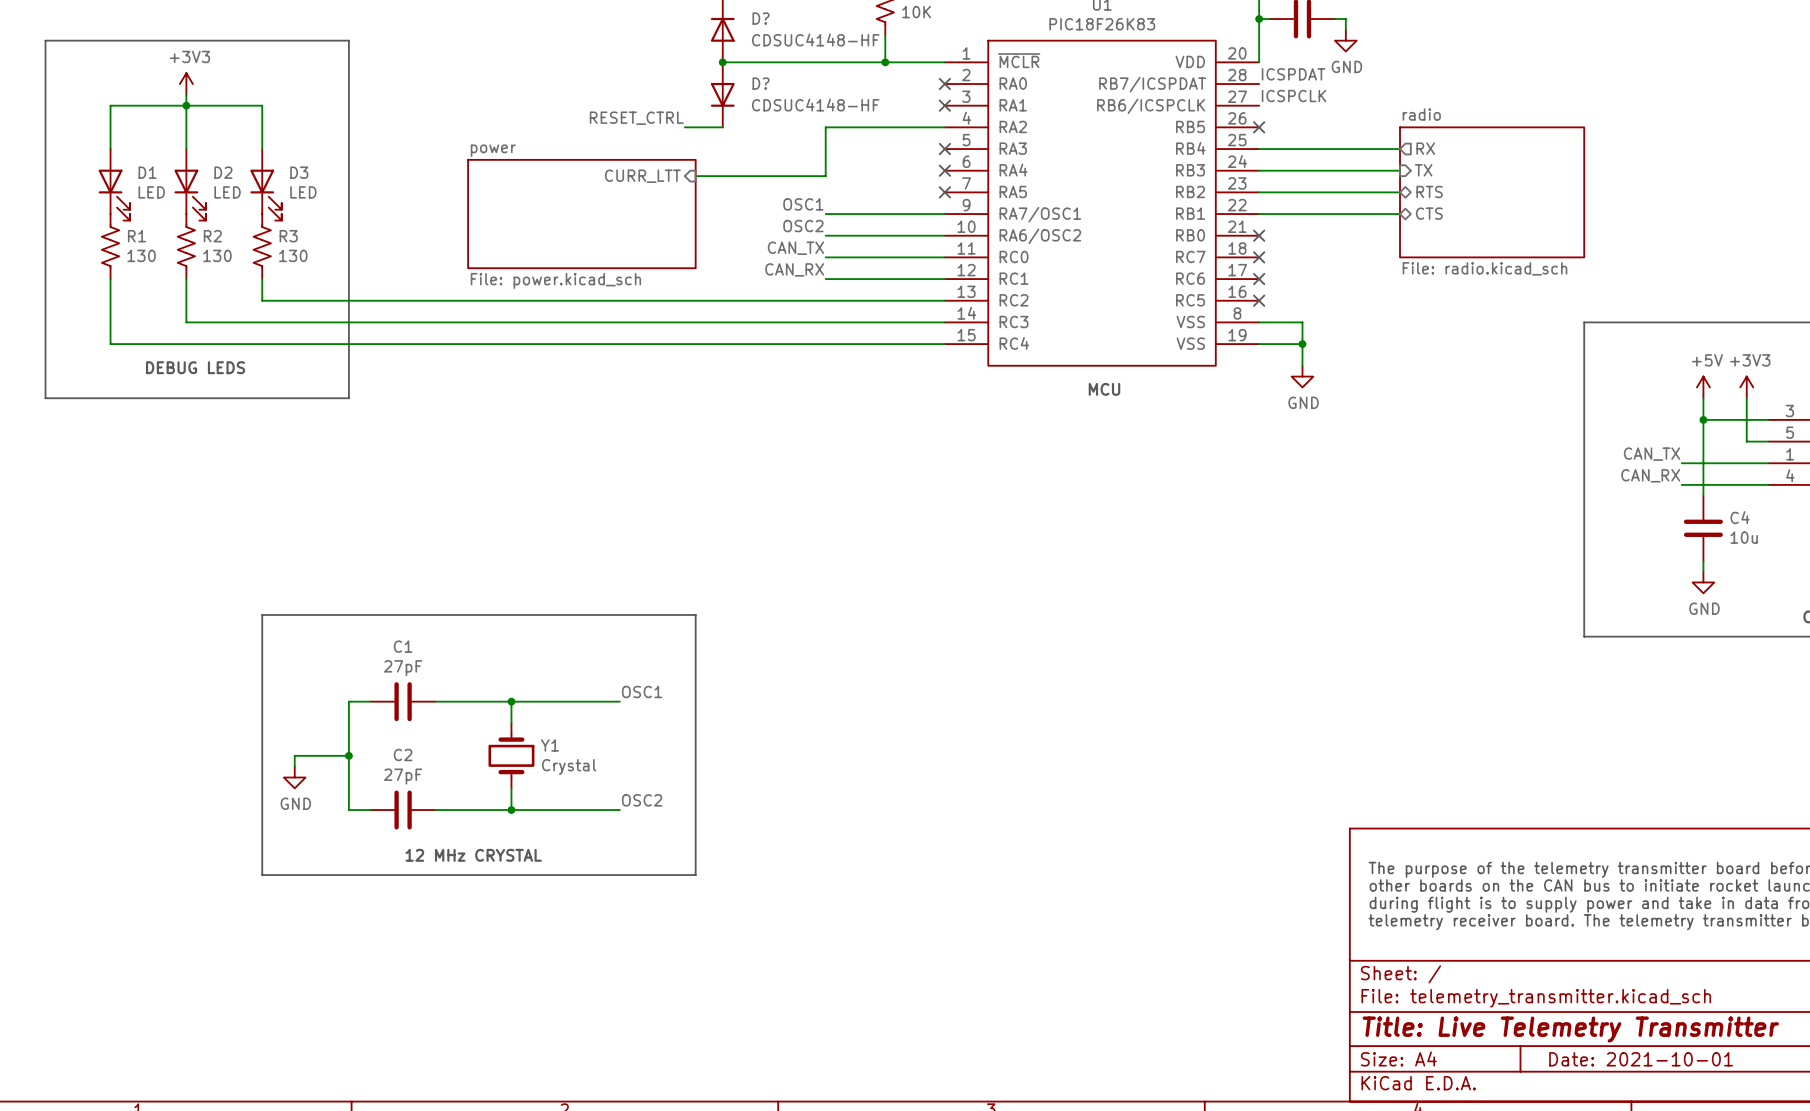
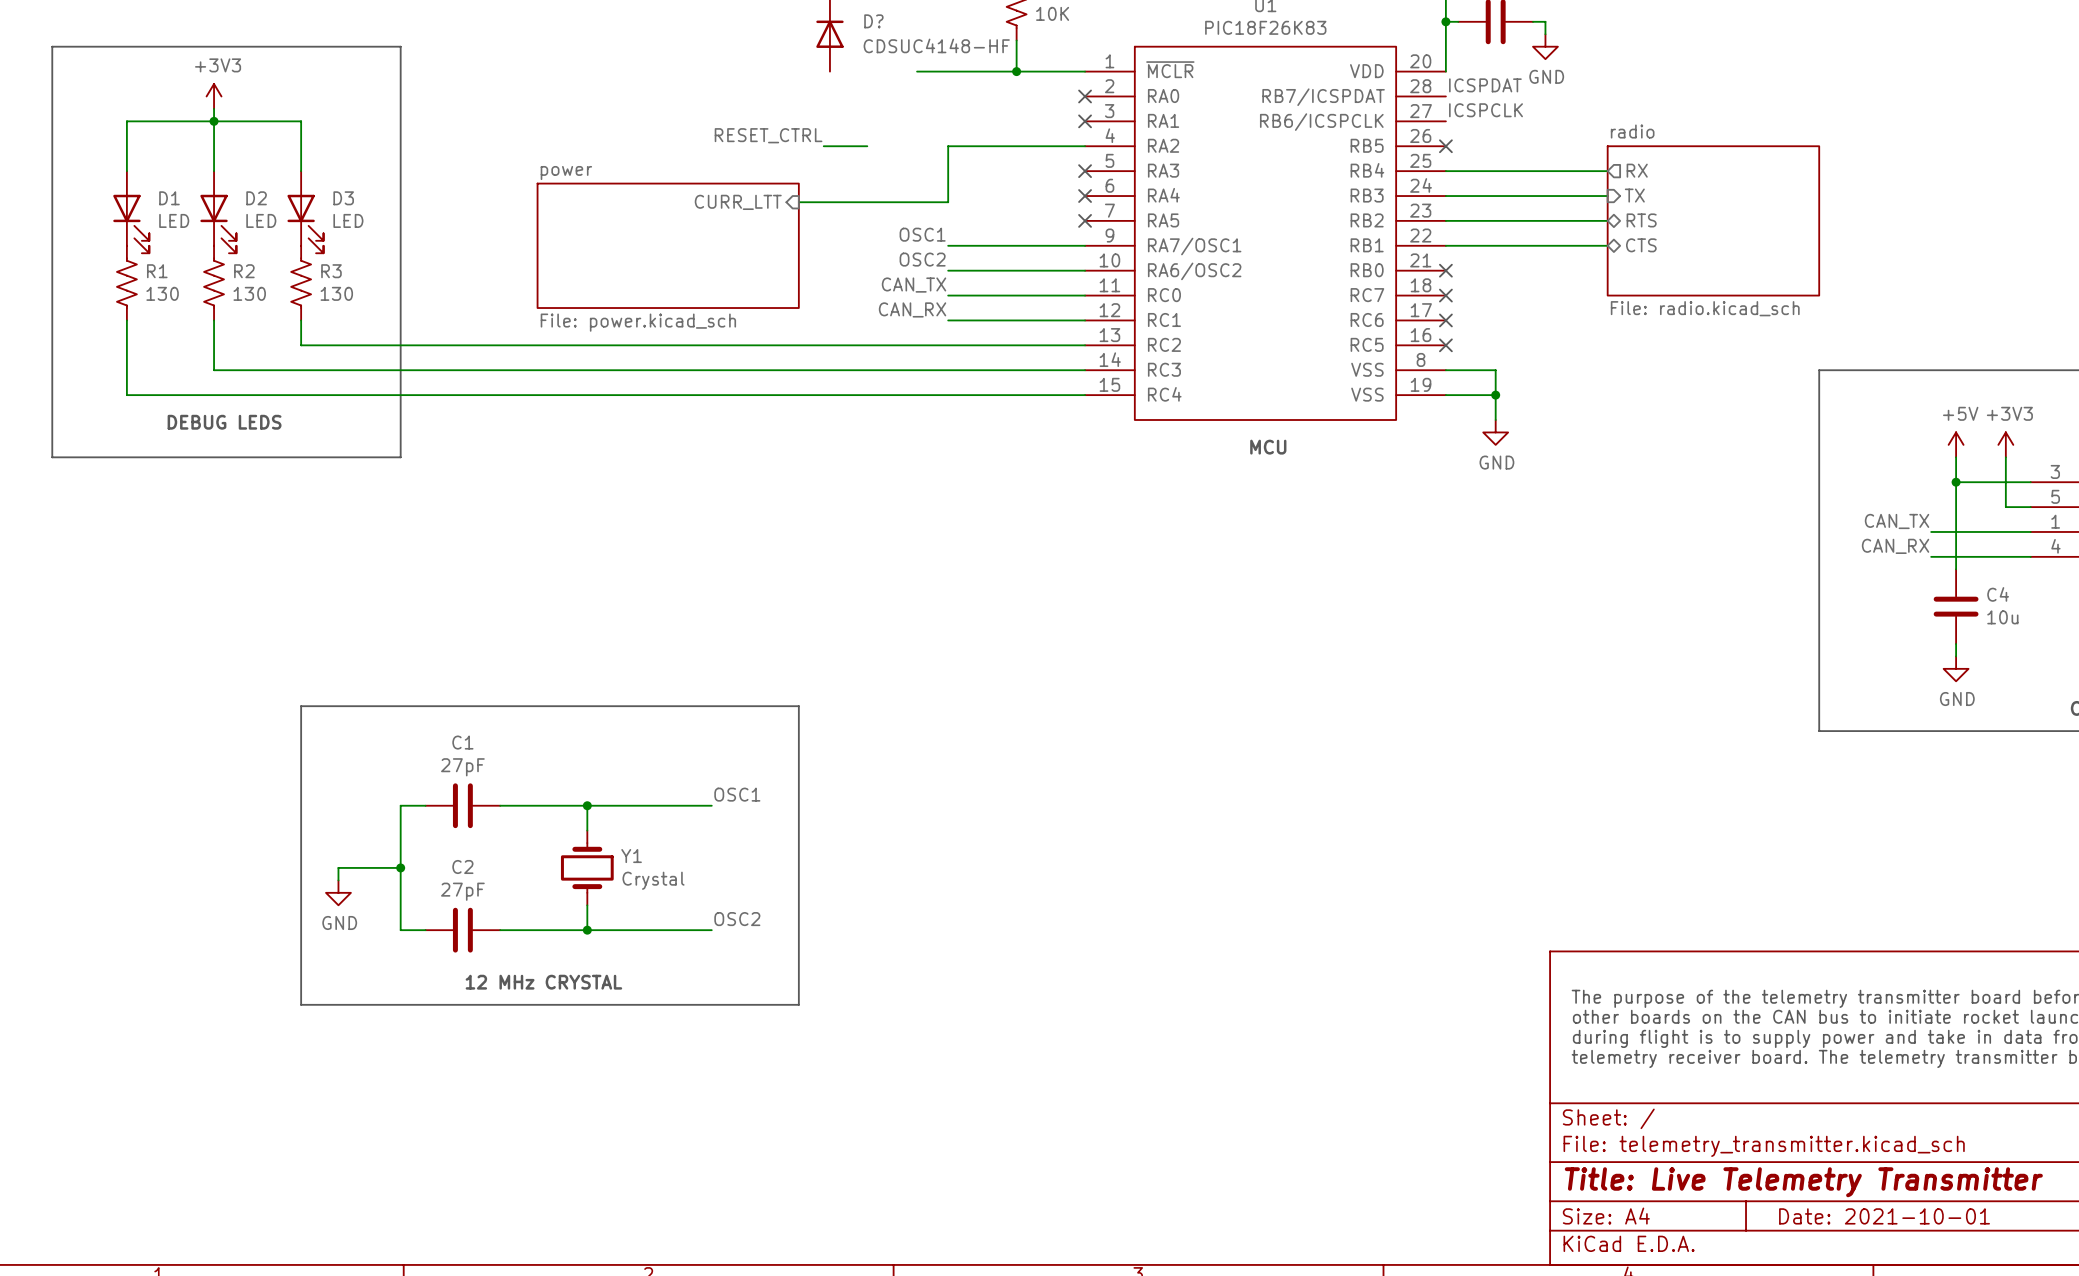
wire: (722, 62) (798, 62) -> none
junction: (722, 62) -> none
D?: CDSUC4148-HF (722, 94) -> none
label position: RESET_CTRL (636, 118) -> RESET_CTRL (768, 135)
wire: (684, 127) (717, 127) -> (829, 146) (867, 146)

